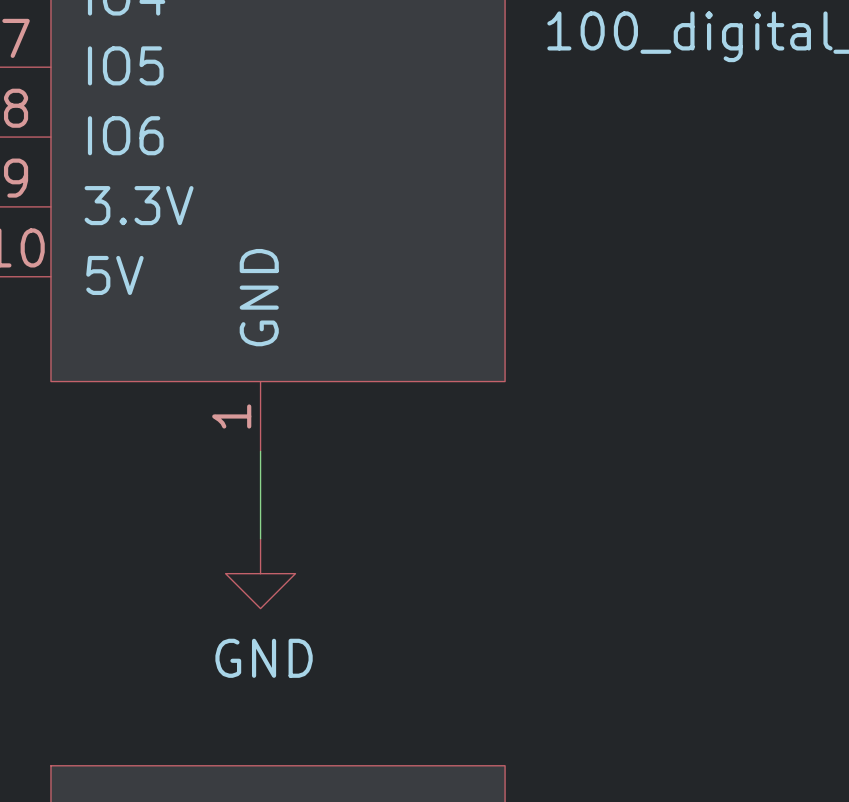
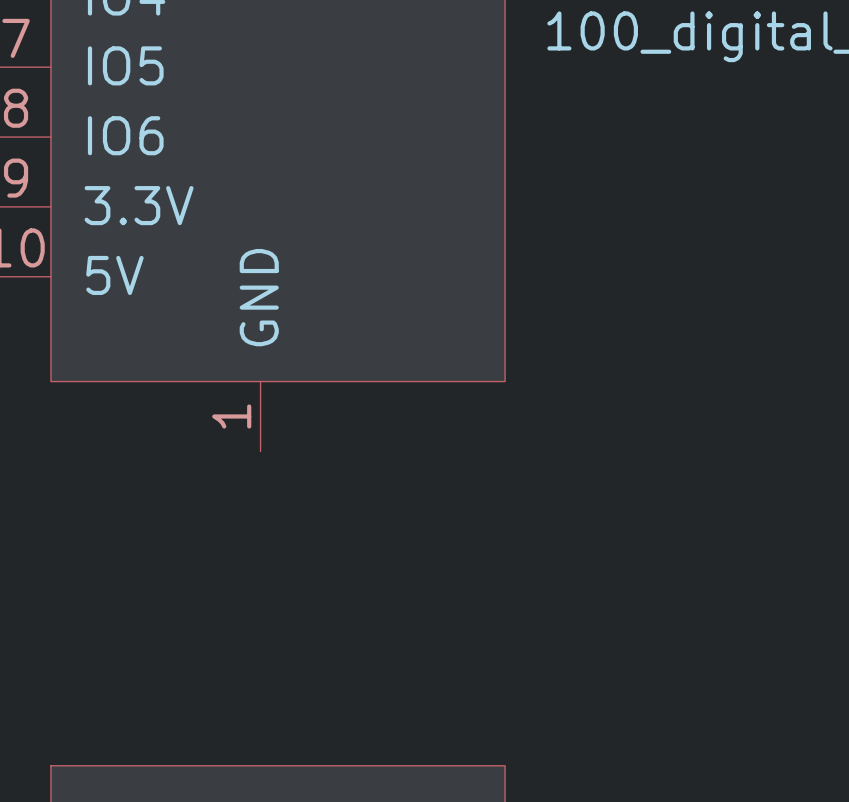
wire: (260, 451) (260, 538) -> none
power symbol: GND (260, 573) -> none

